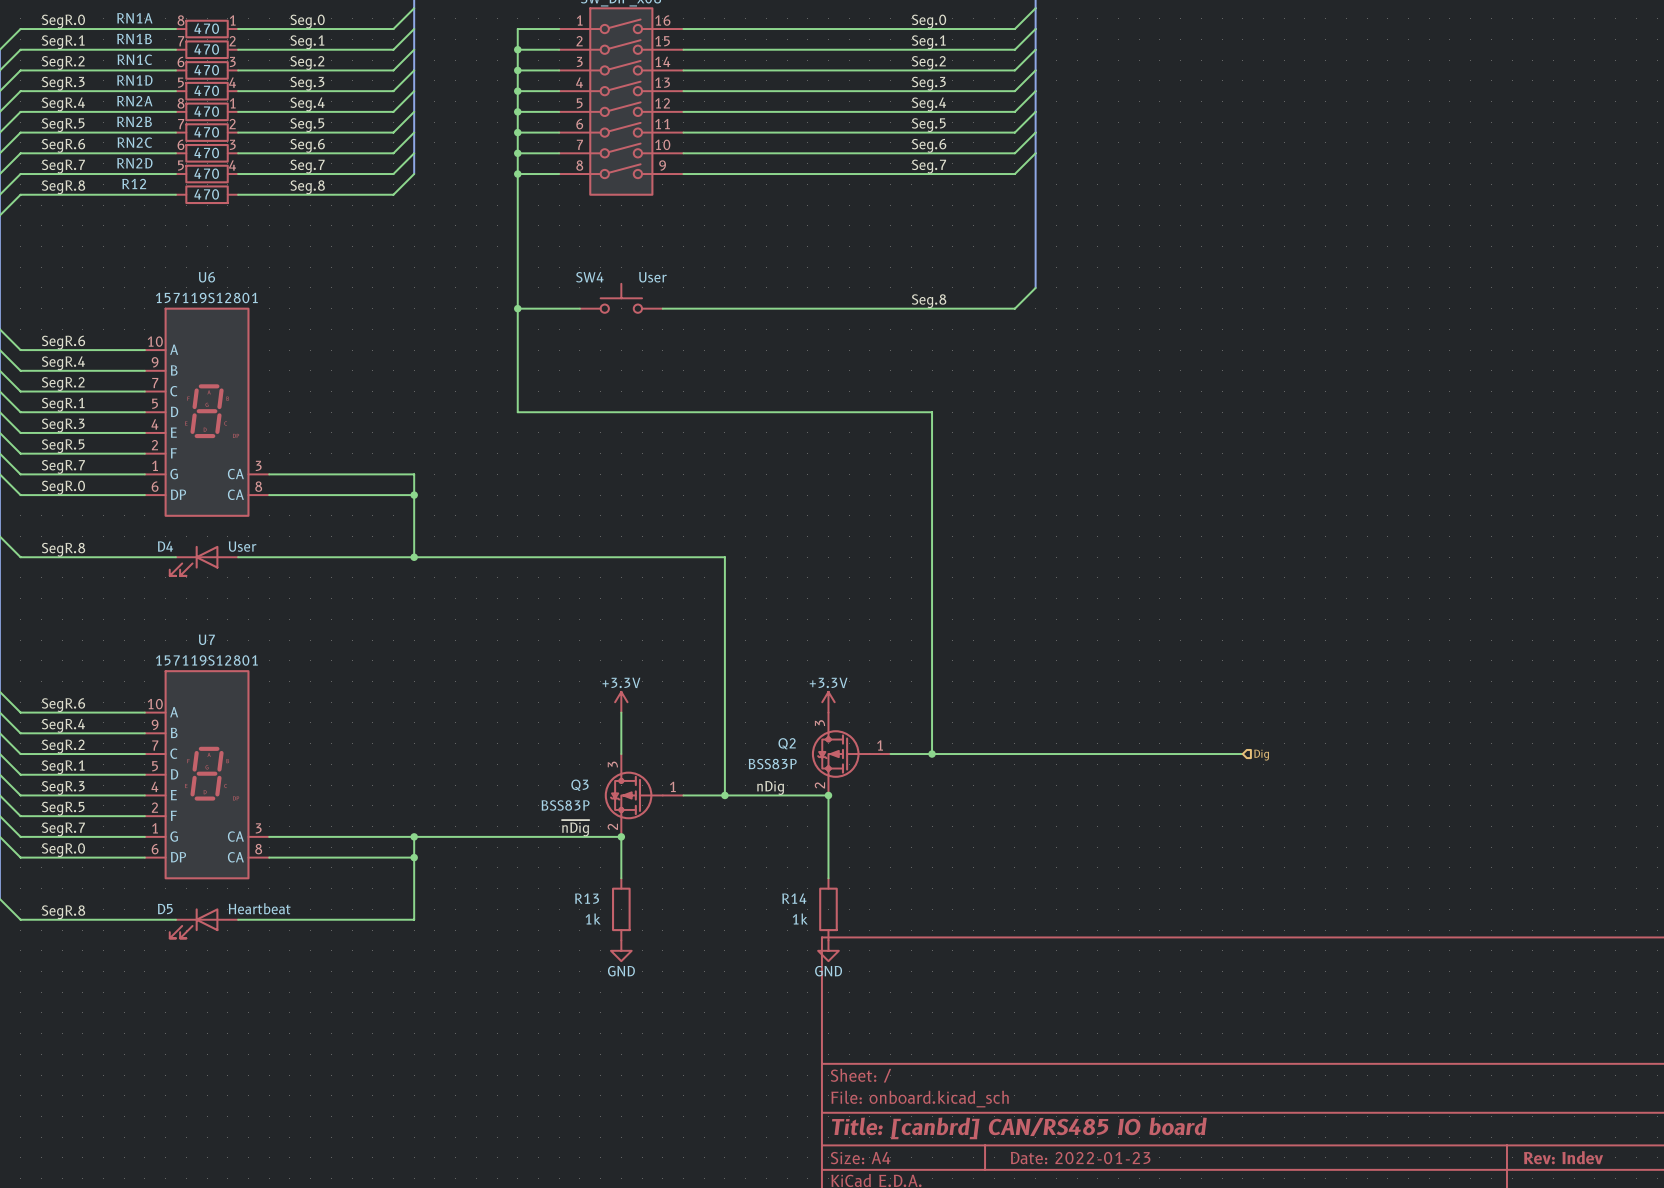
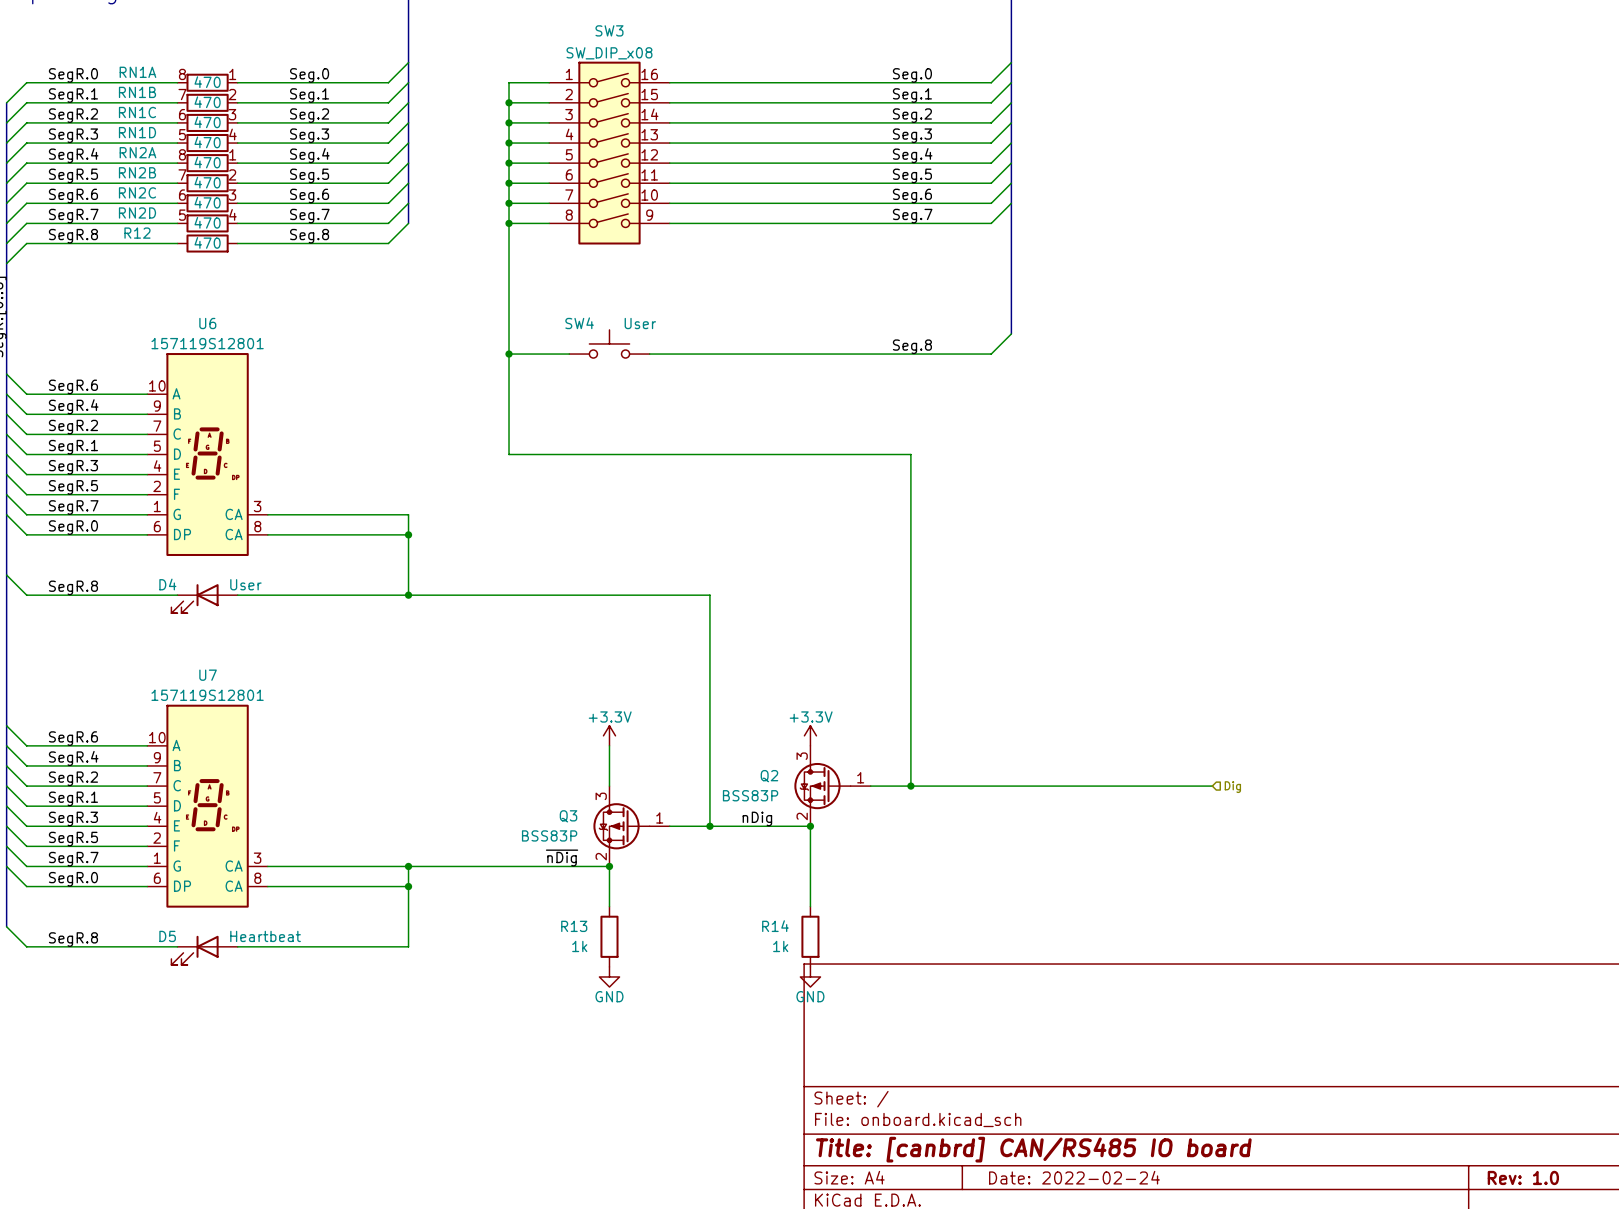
title block: Rev: Indev (1563, 1157) -> Rev: 1.0 (1523, 1177)
title block: Date: 2022-01-23 (1080, 1158) -> Date: 2022-02-24 (1074, 1177)

